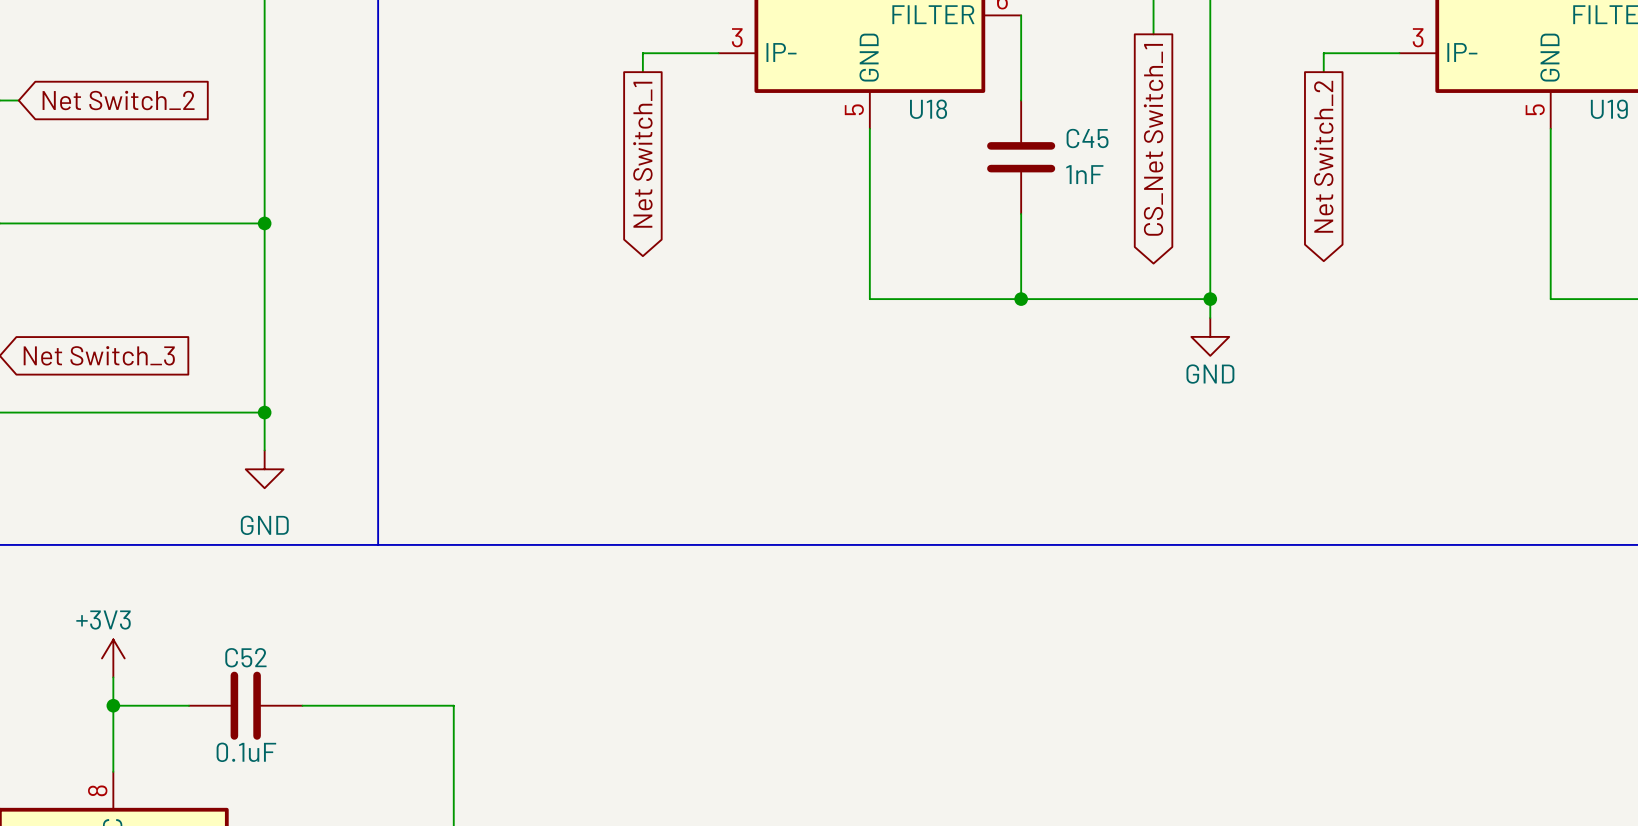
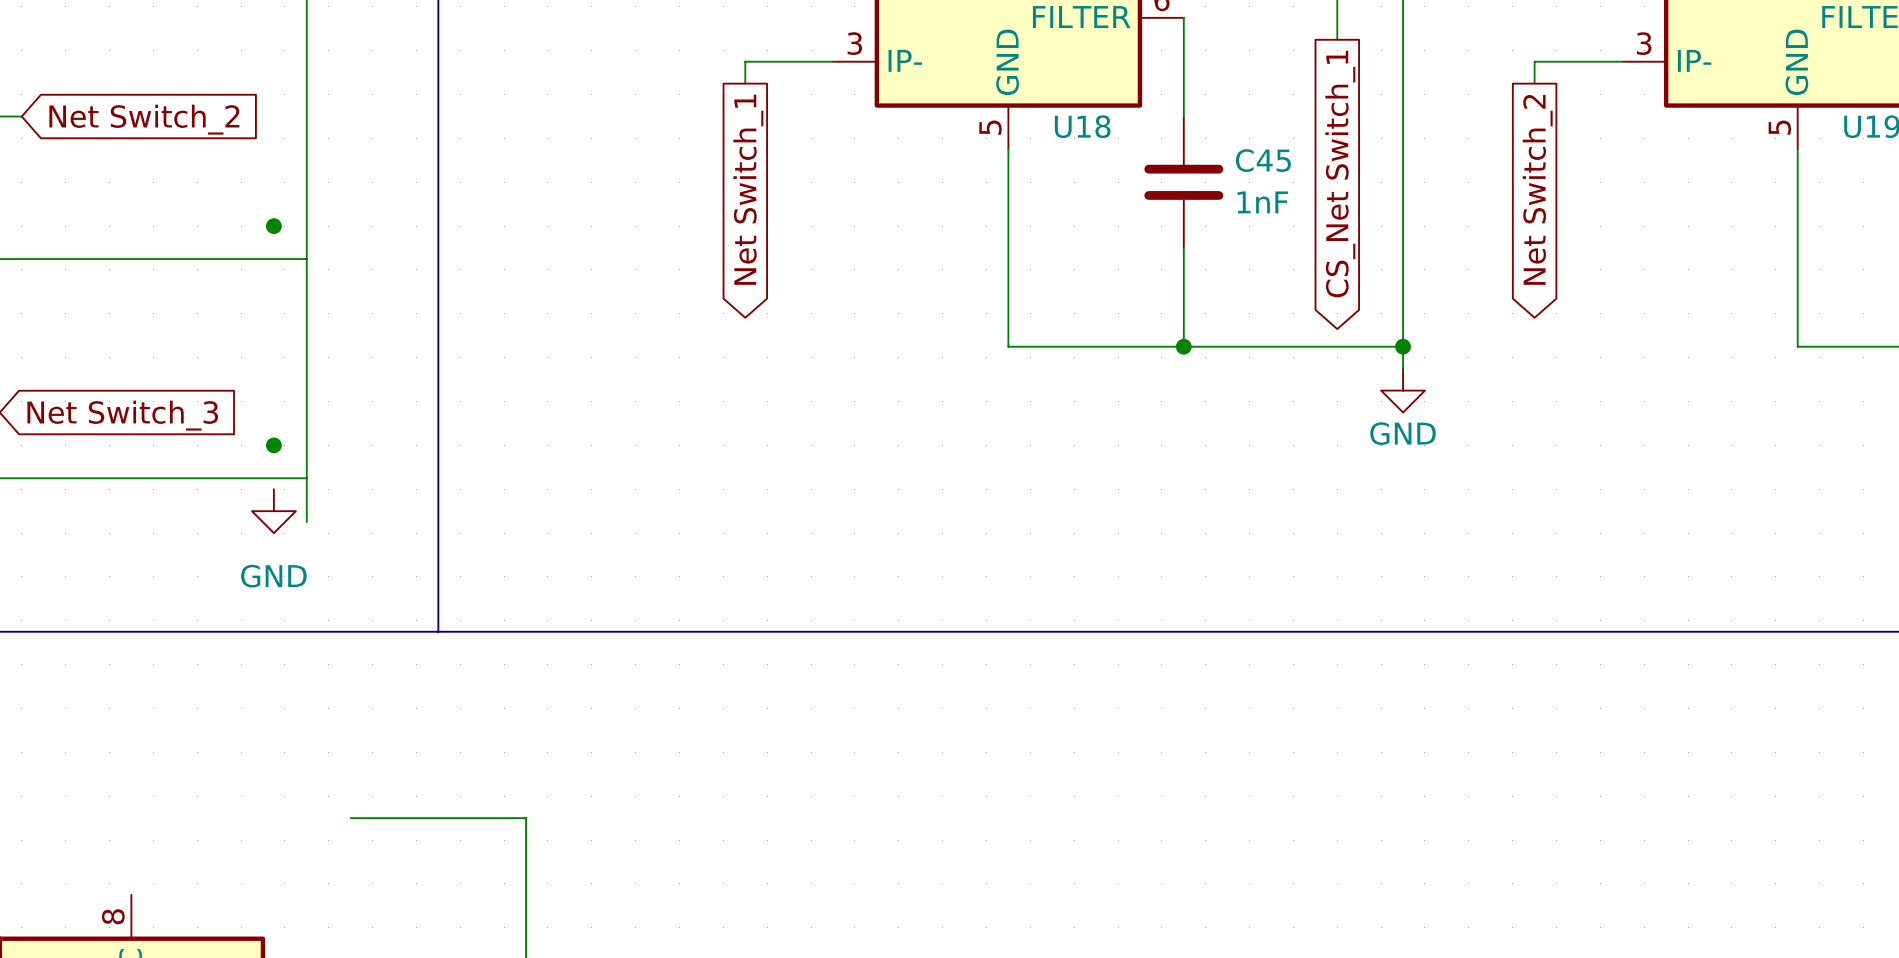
junction position: (264, 223) -> (273, 226)
junction position: (264, 412) -> (273, 445)
power symbol position: GND (264, 469) -> GND (273, 511)
power symbol: +3V3 (113, 658) -> none
wire: (113, 677) (113, 771) -> none
wire: (113, 705) (188, 705) -> none
junction: (113, 705) -> none
C52: 0.1uF (245, 705) -> none

